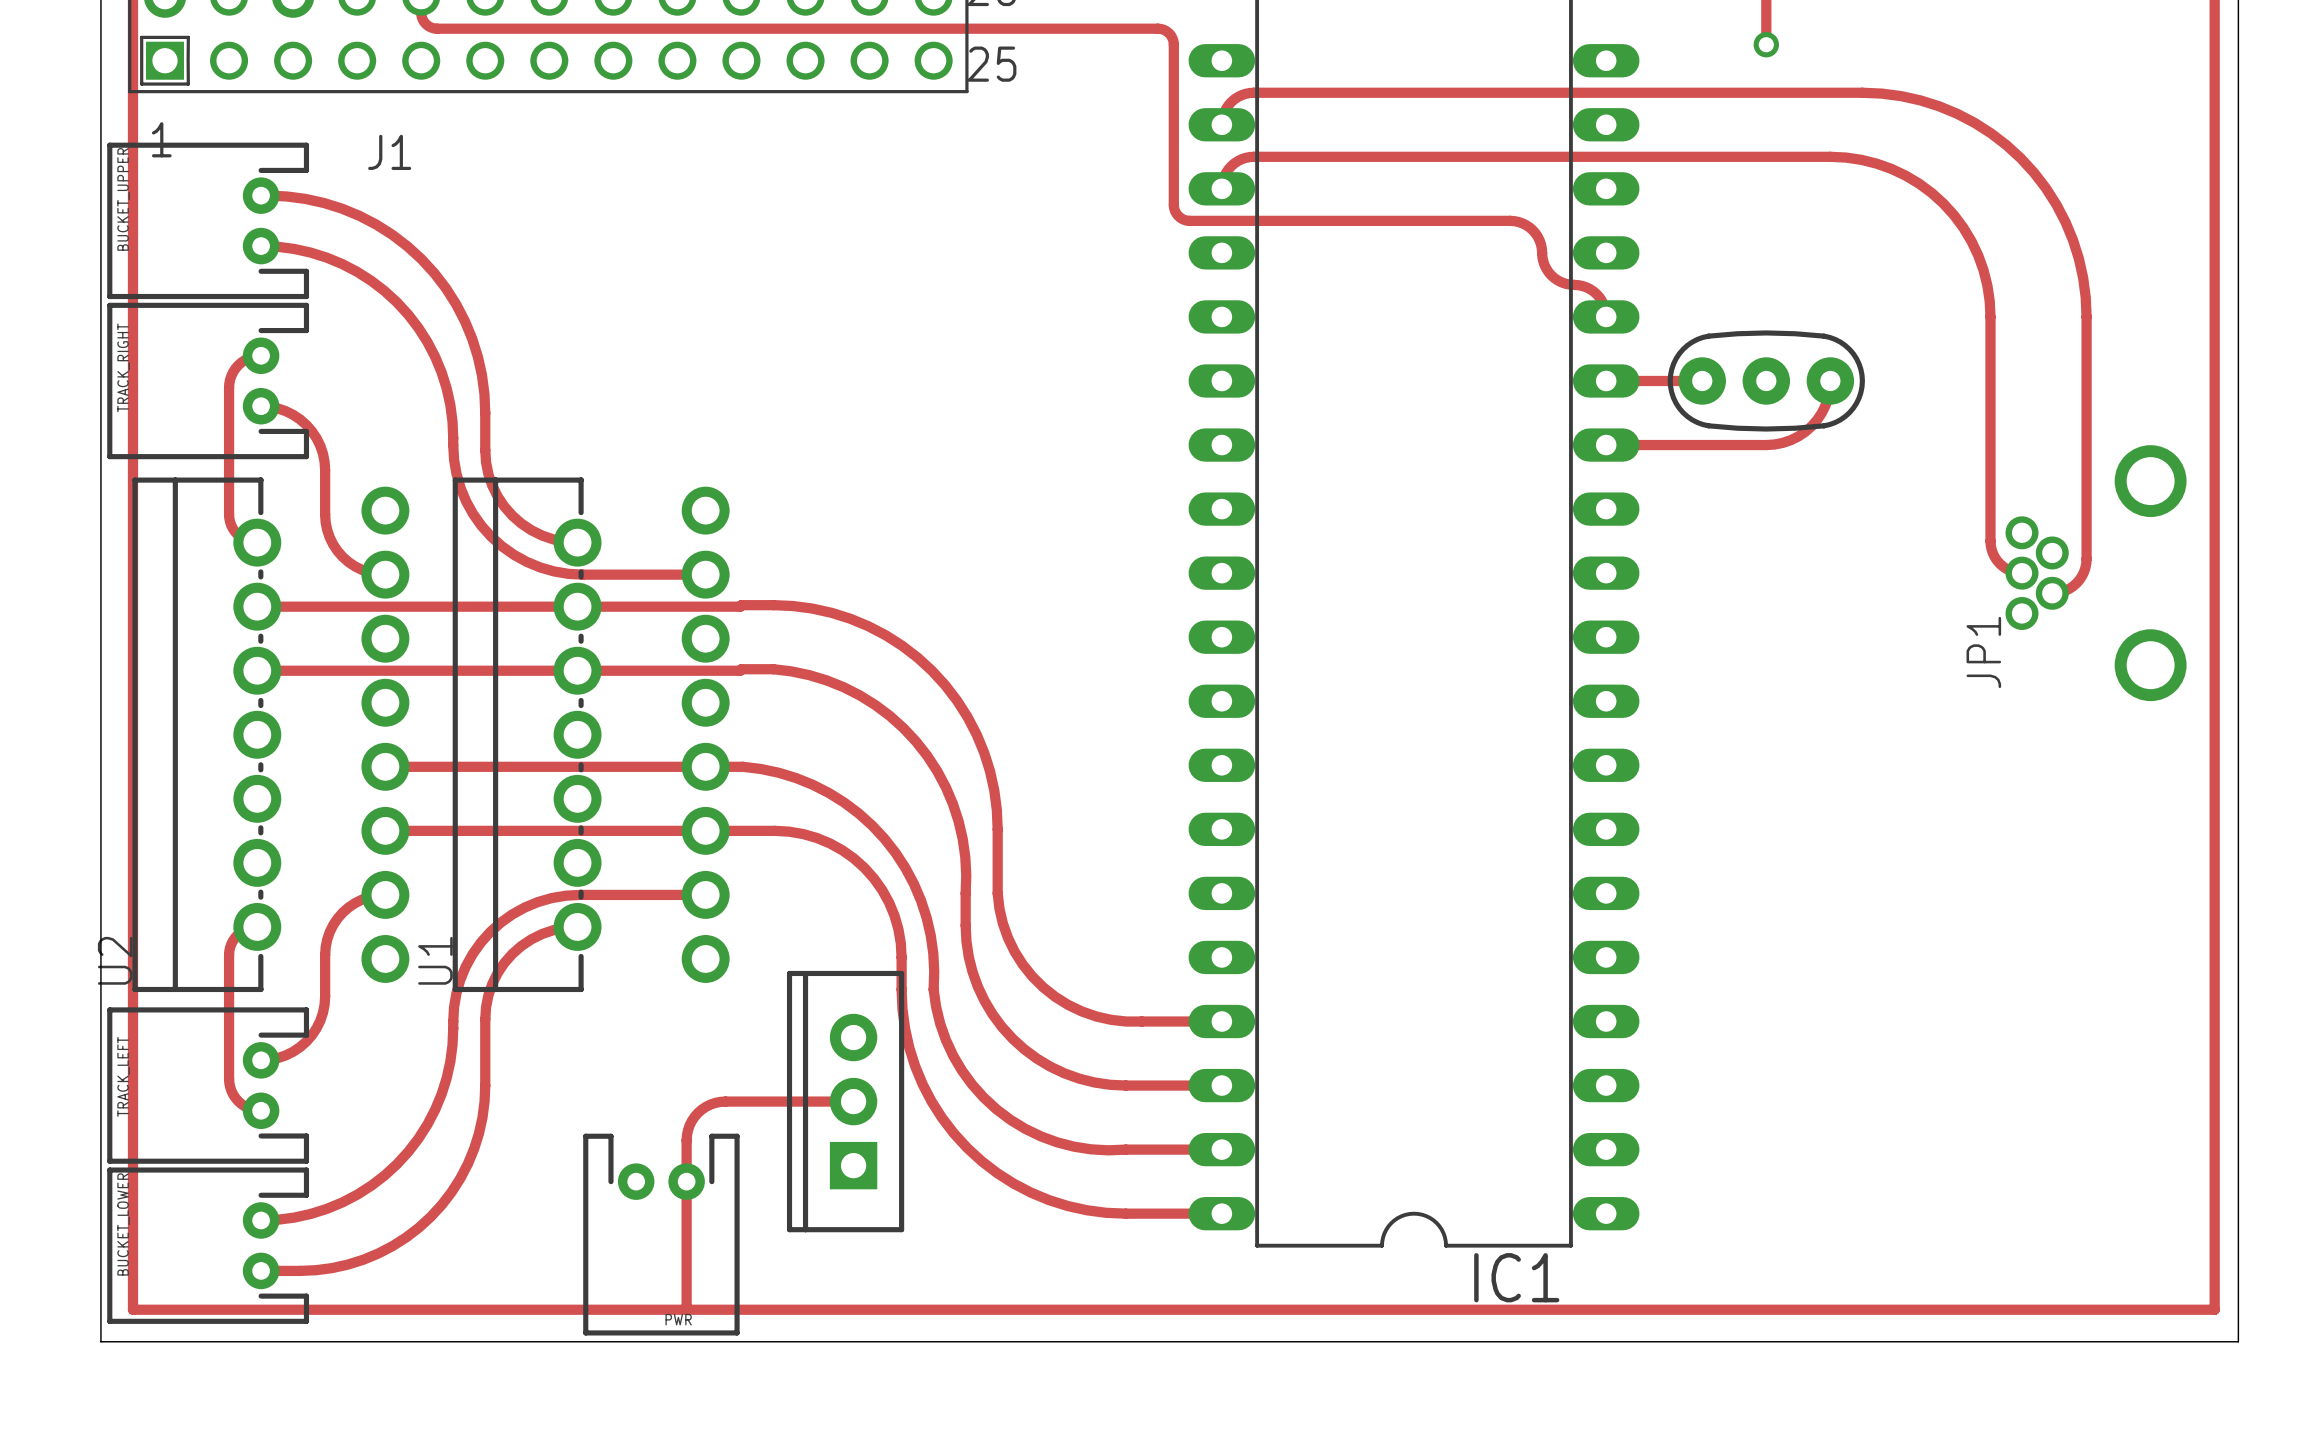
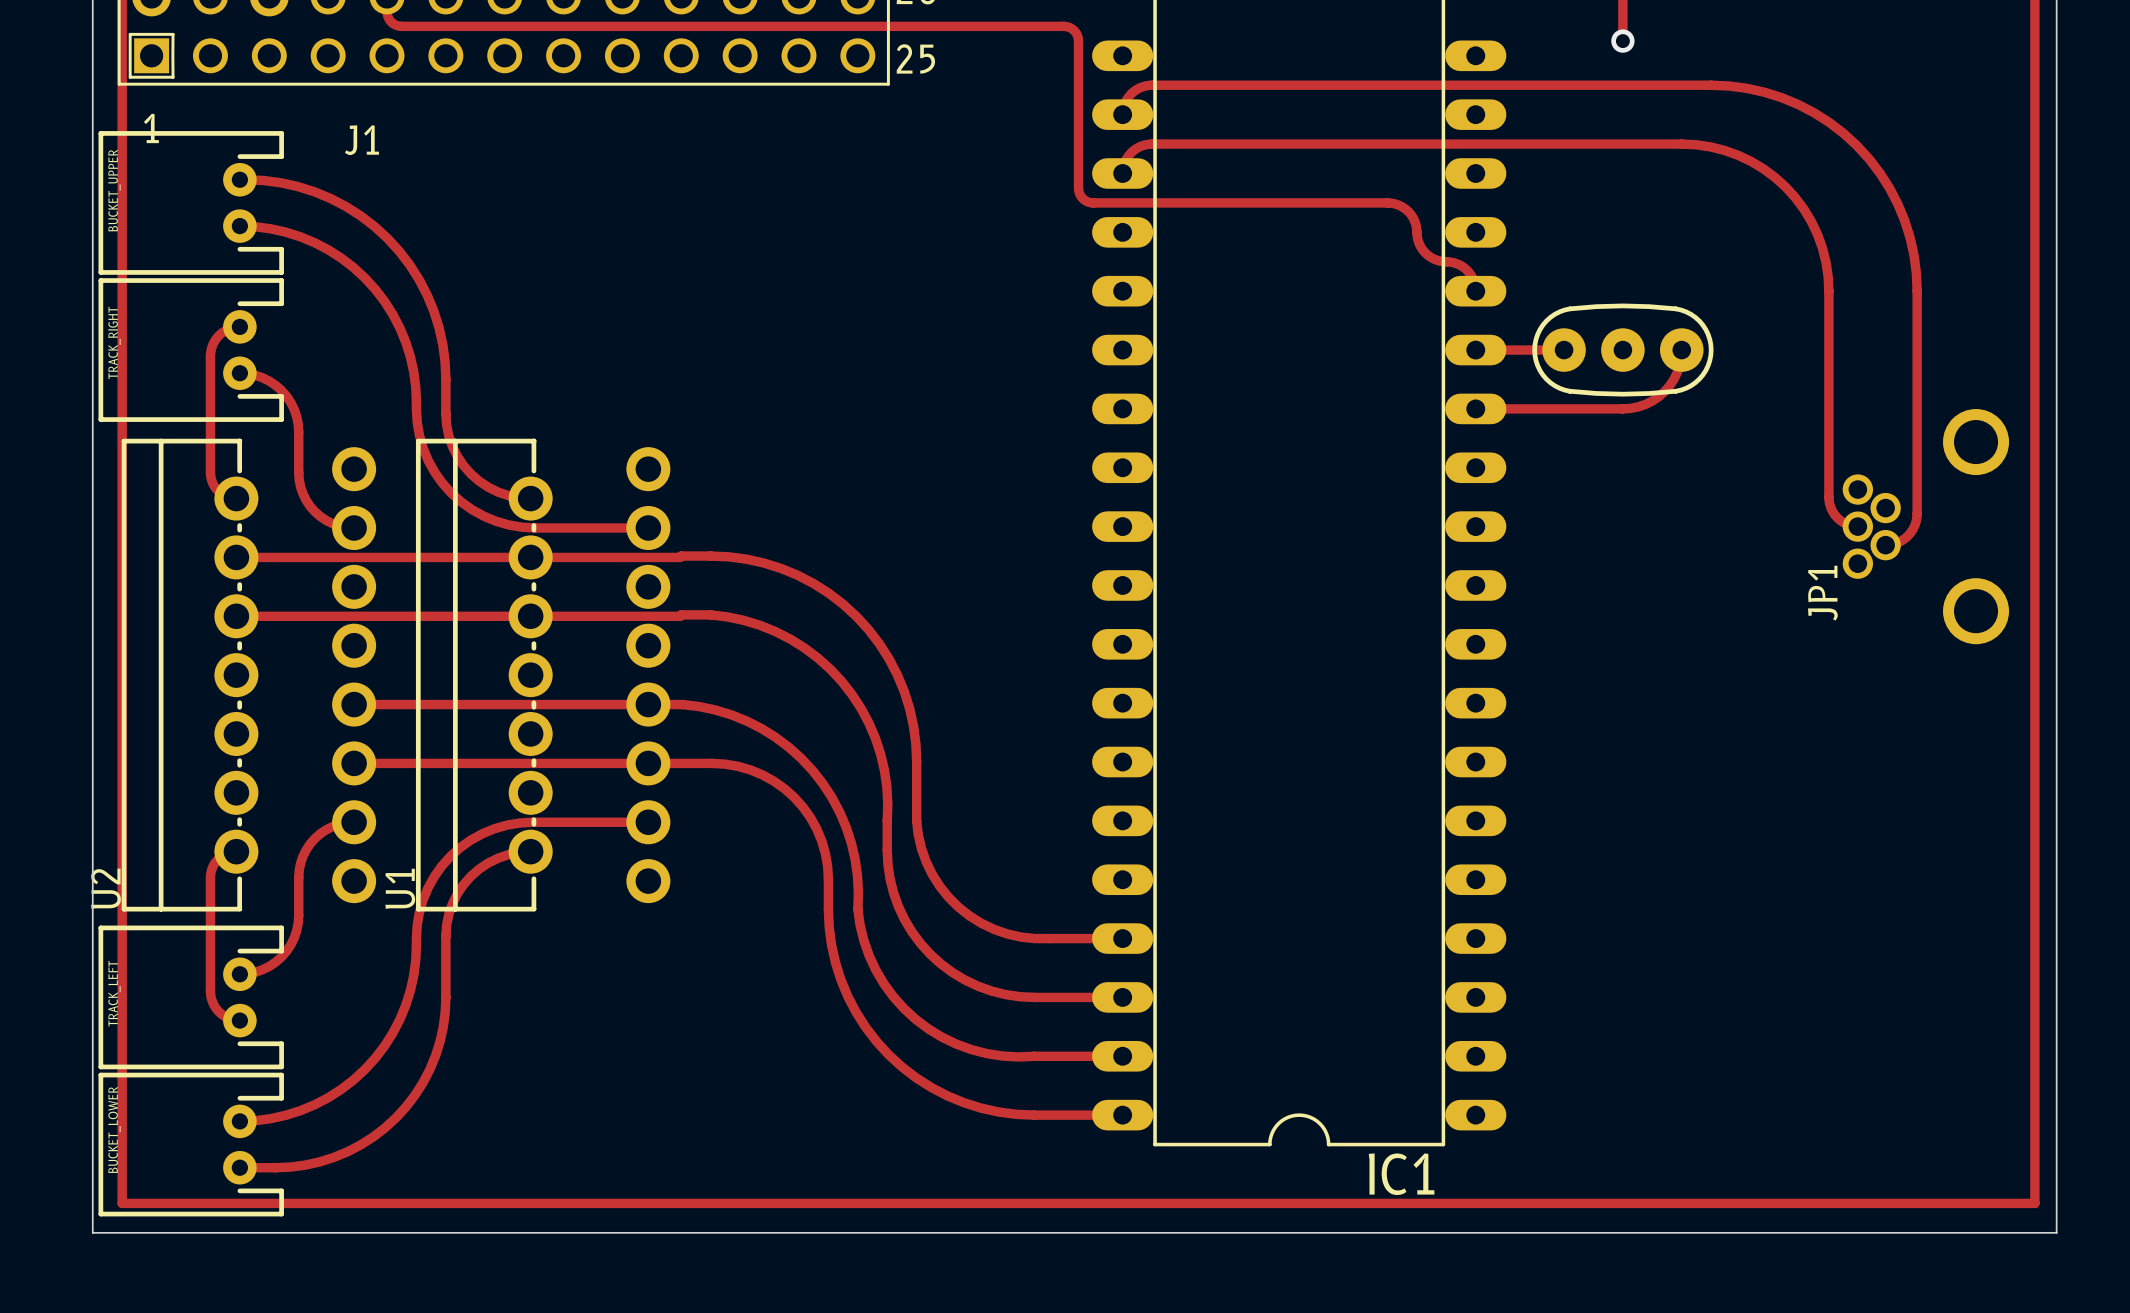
part: (845, 1101) -> none
track: (853, 1101) (720, 1101) (706, 1106) (694, 1116) (689, 1125) (686, 1140) (686, 1309) -> none
PWR: (661, 1234) -> none

